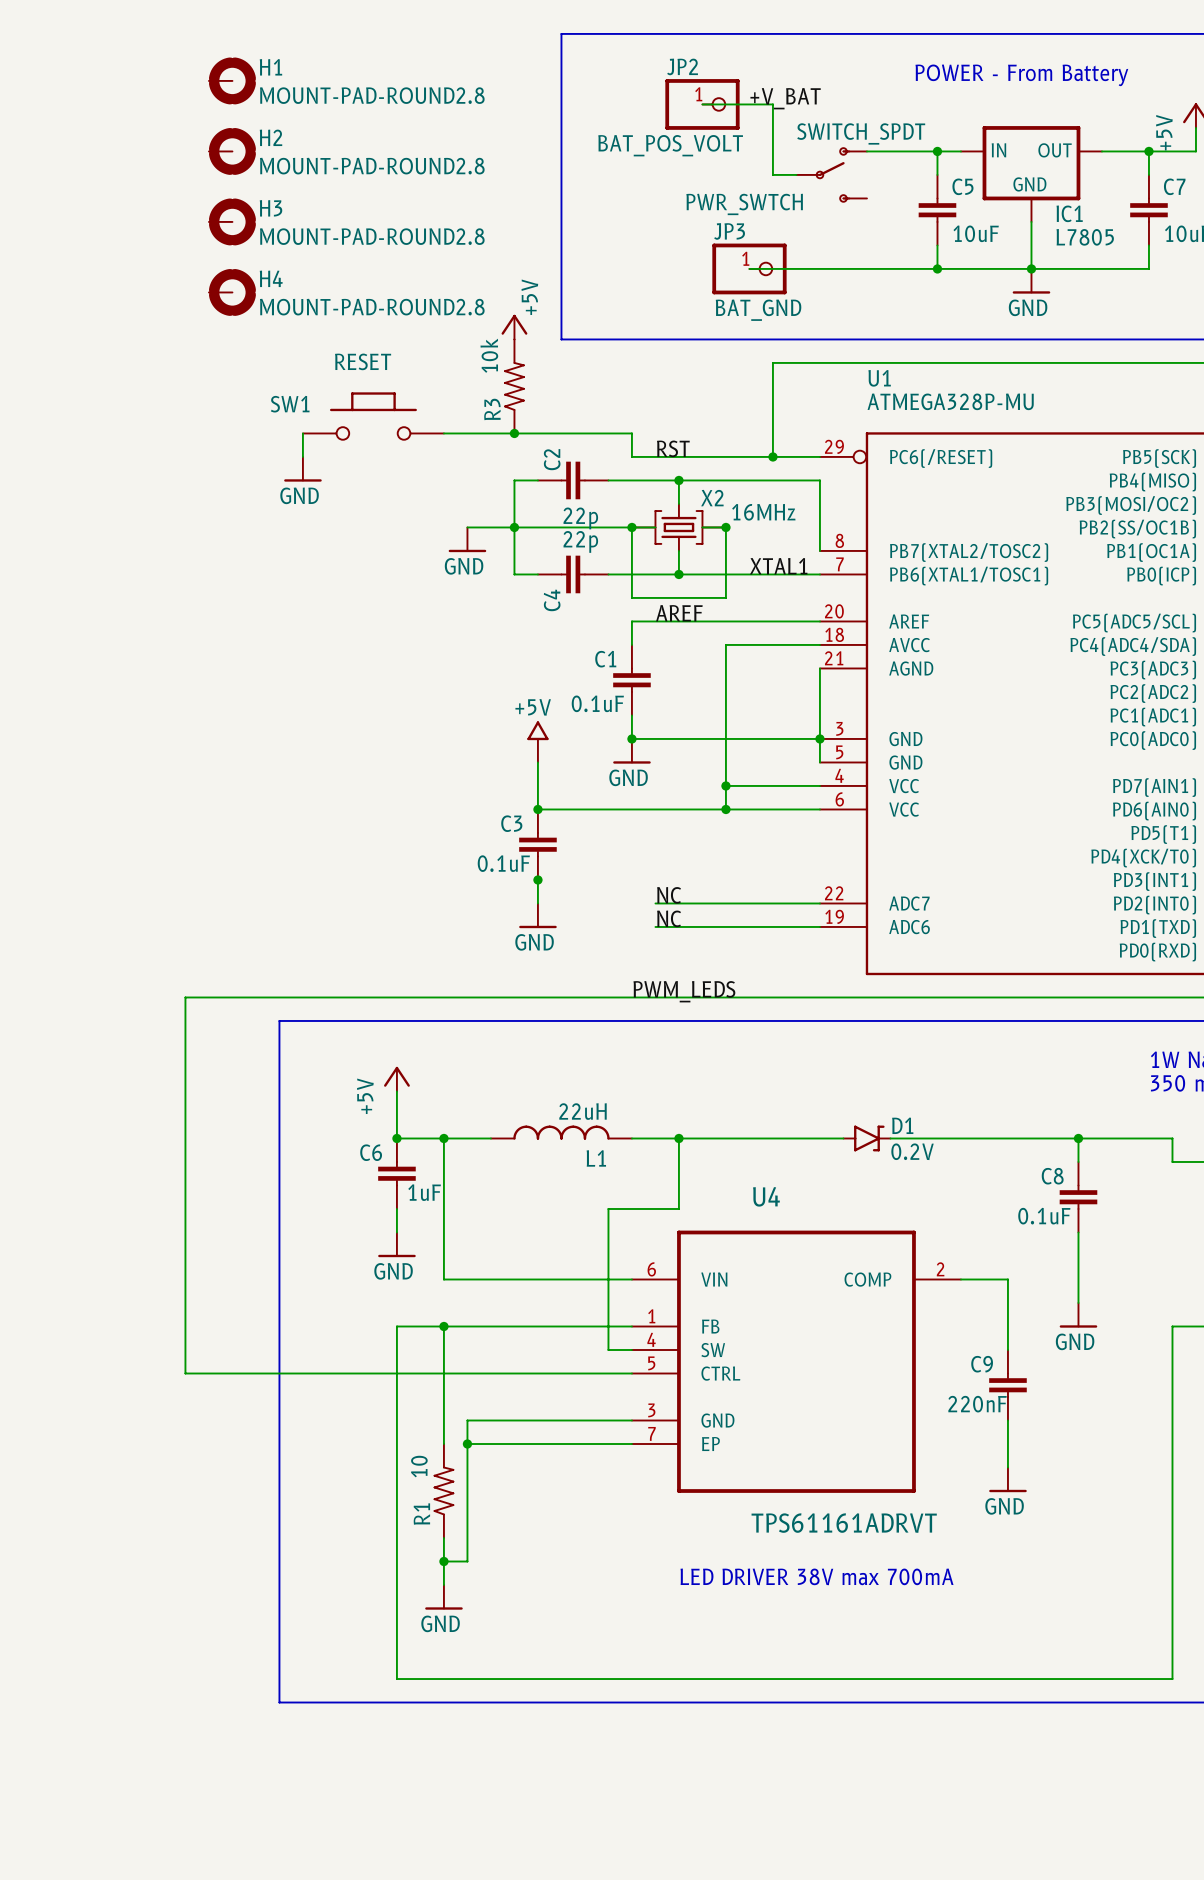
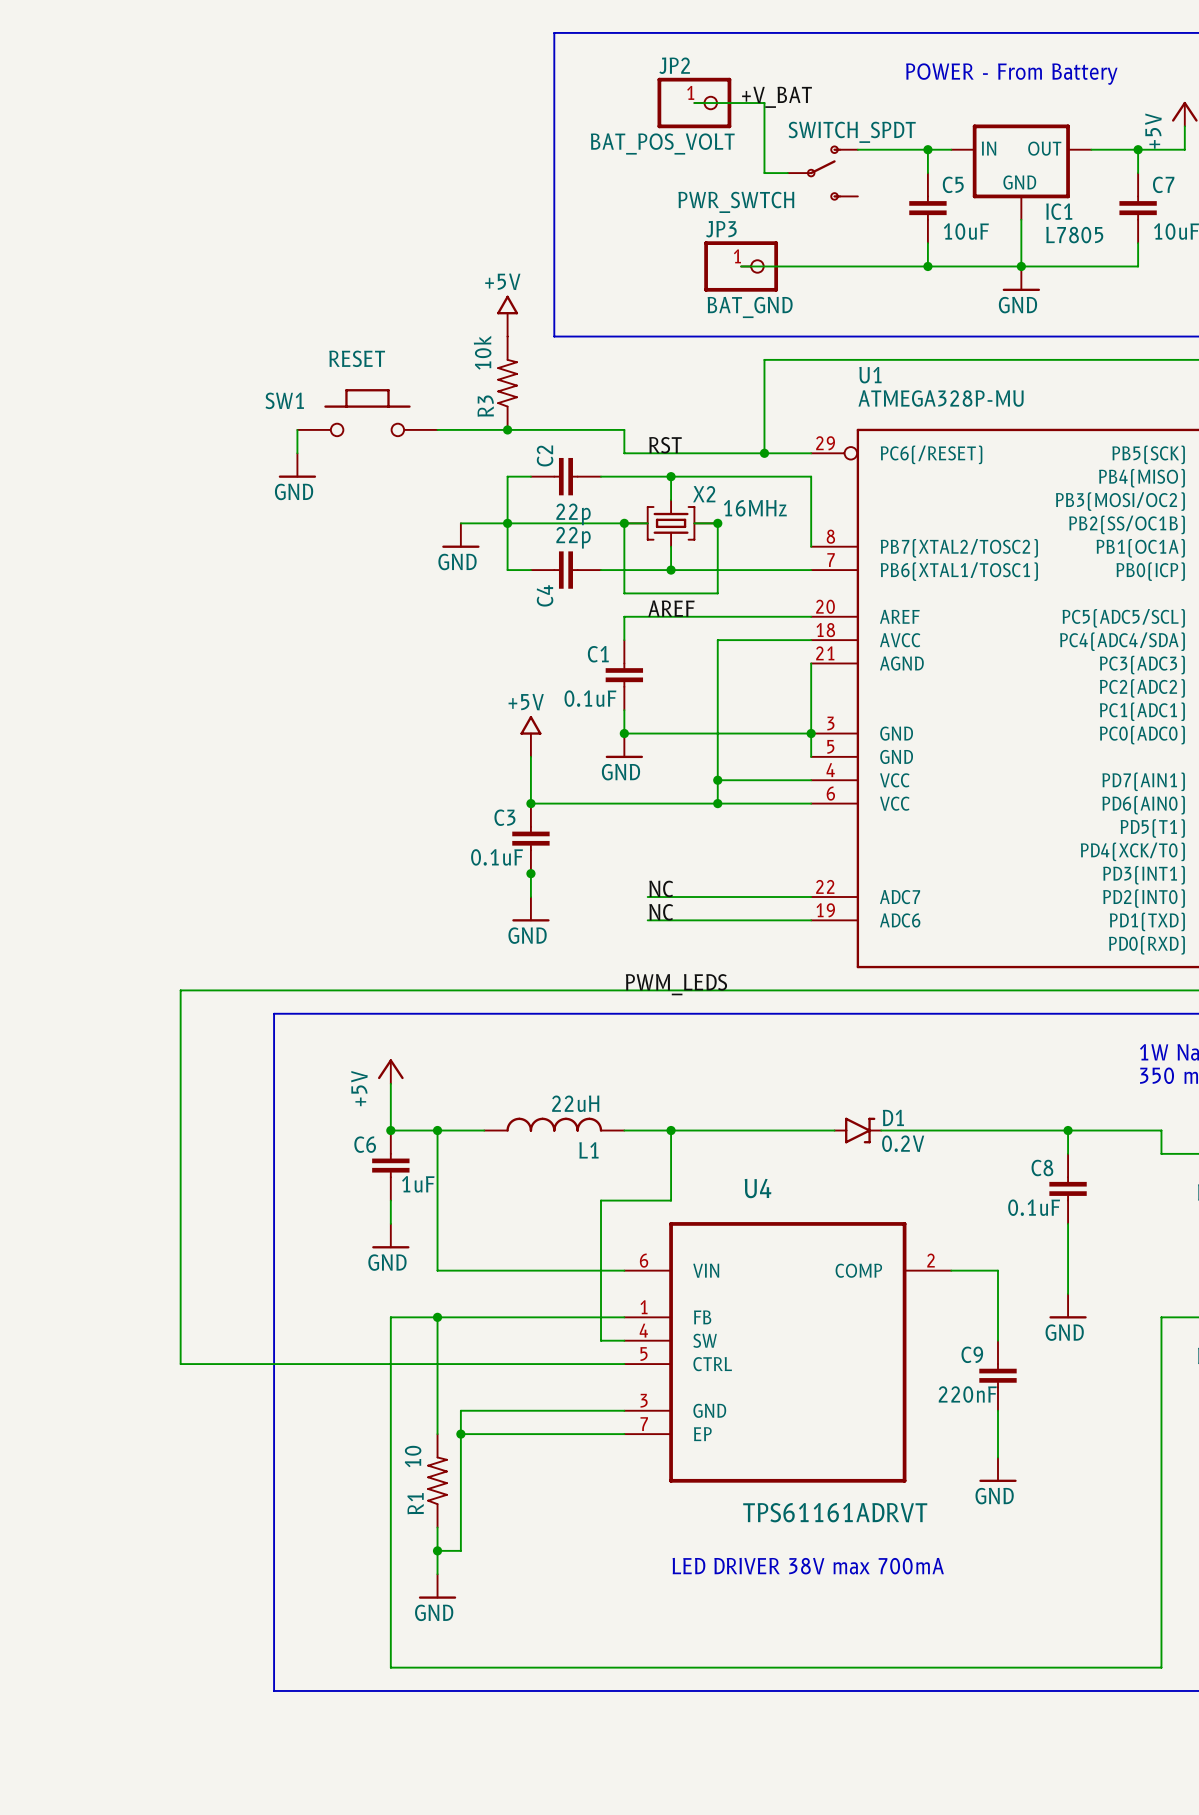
H1: MOUNT-PAD-ROUND2.8 (232, 80) -> none
H2: MOUNT-PAD-ROUND2.8 (232, 151) -> none
H3: MOUNT-PAD-ROUND2.8 (232, 221) -> none
H4: MOUNT-PAD-ROUND2.8 (232, 292) -> none
power symbol shape: [501, 314, 528, 340] -> [497, 295, 519, 337]
label: XTAL1 (778, 566) -> none

